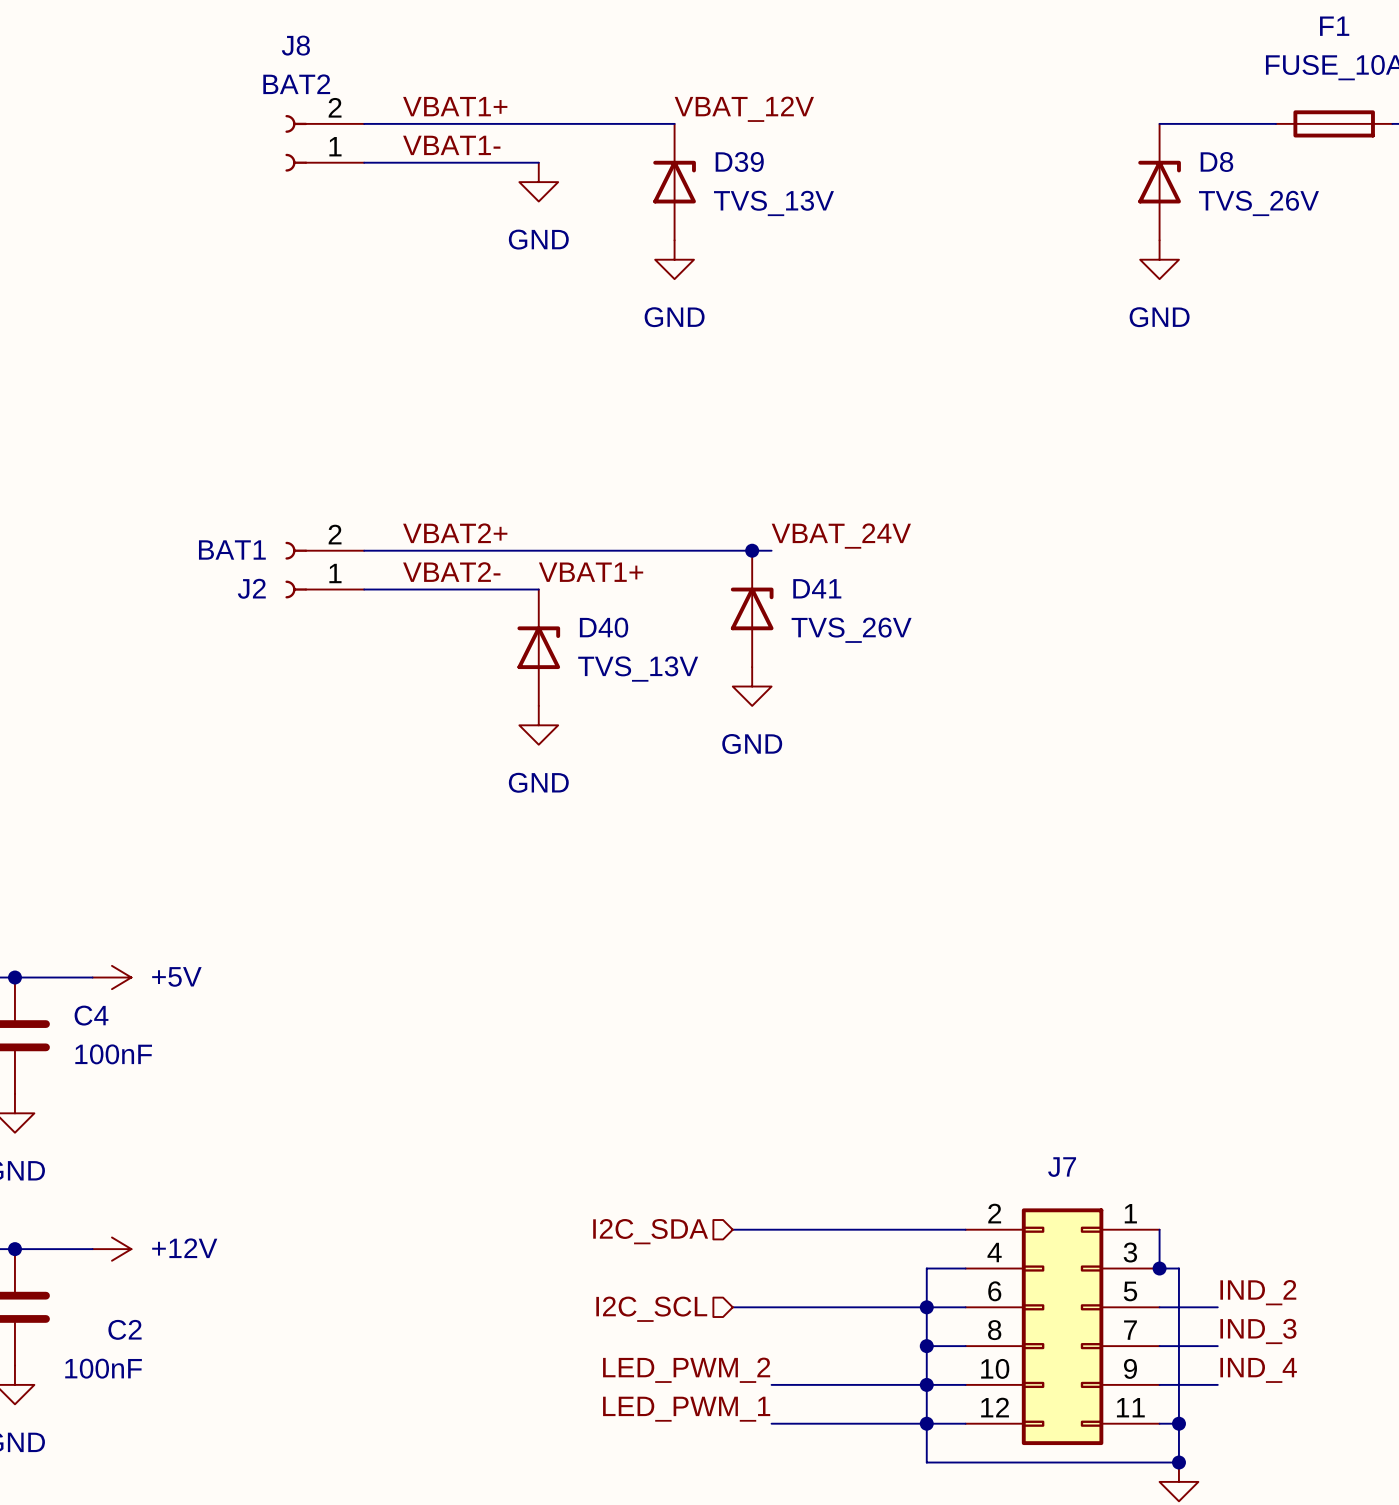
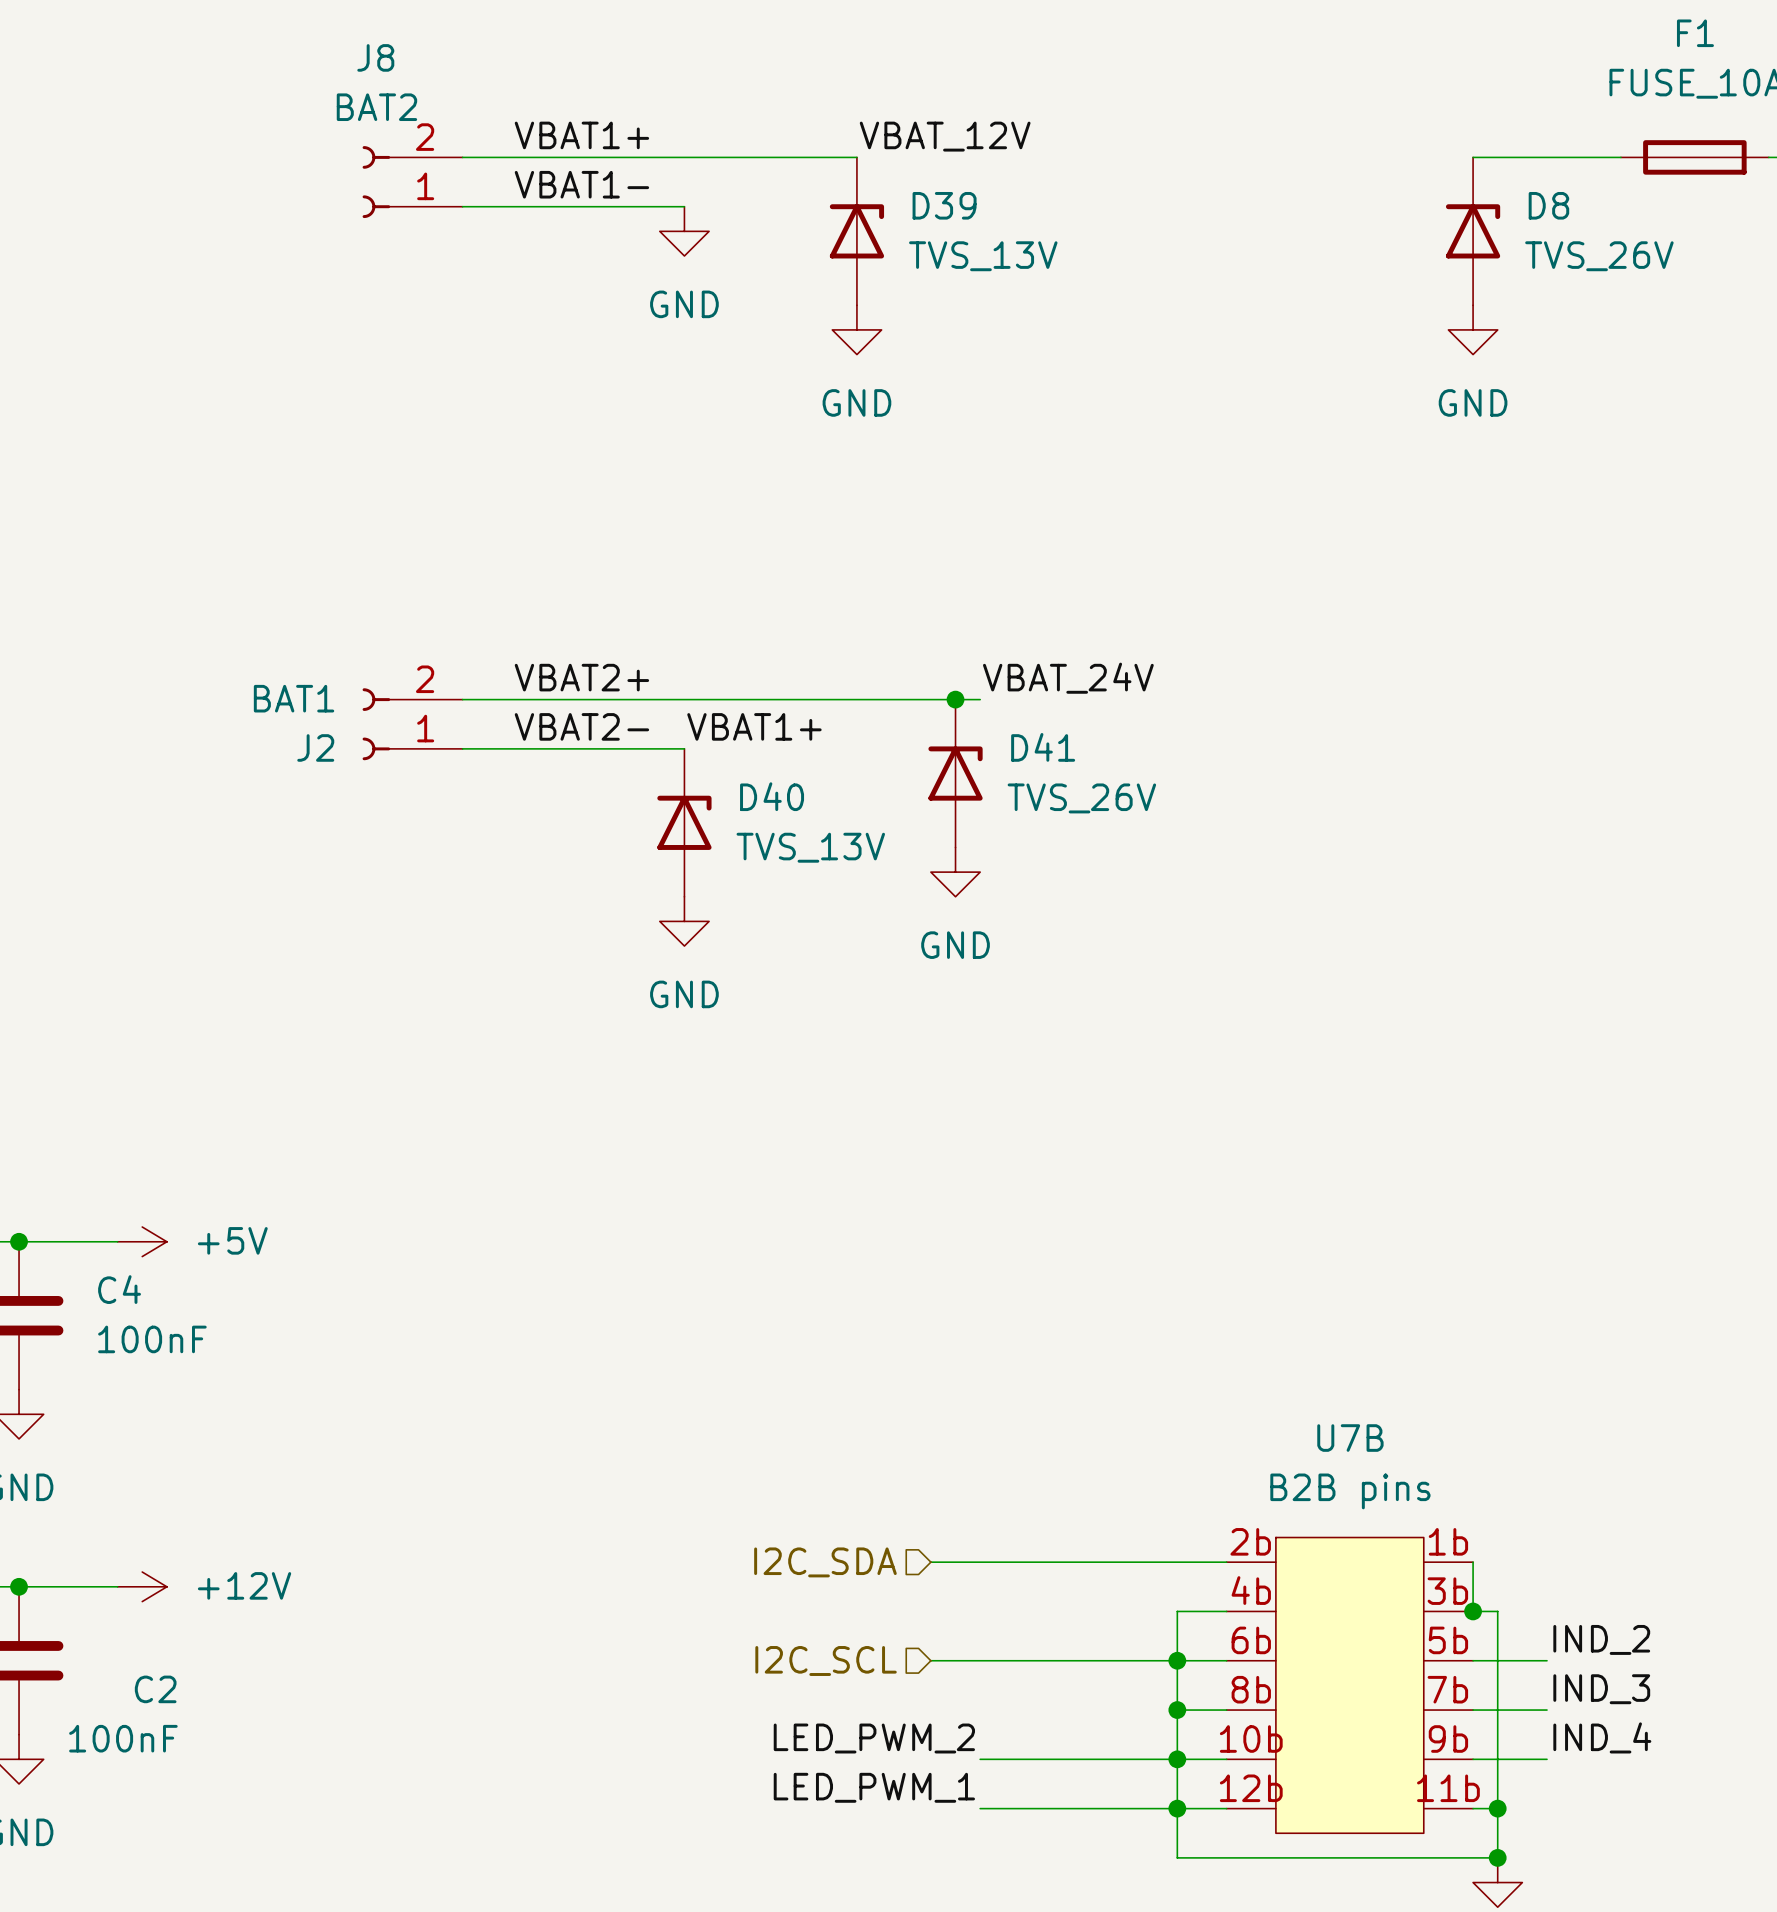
J7: (1062, 1326) -> none
U7B: none -> B2B pins (1349, 1685)

